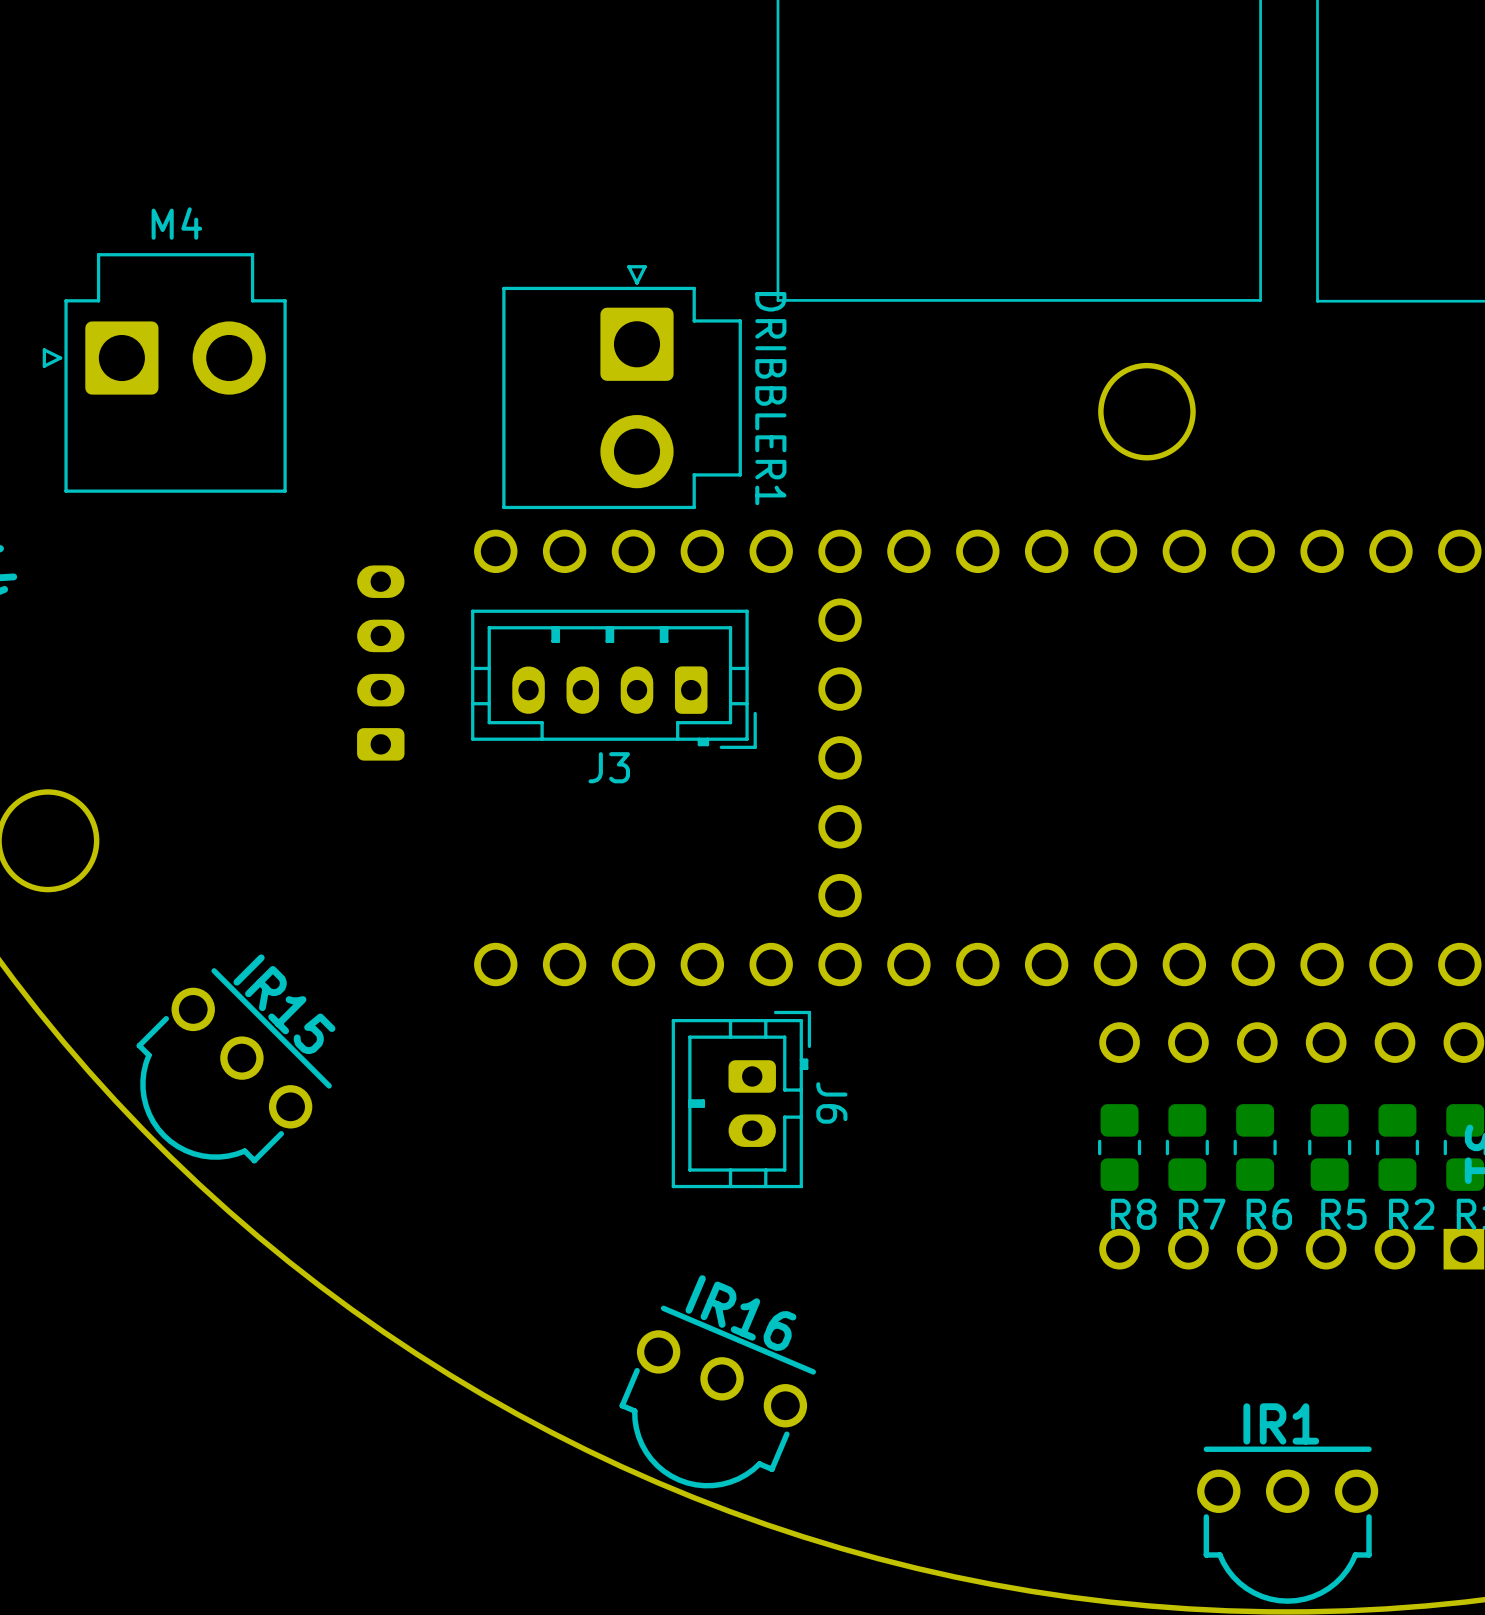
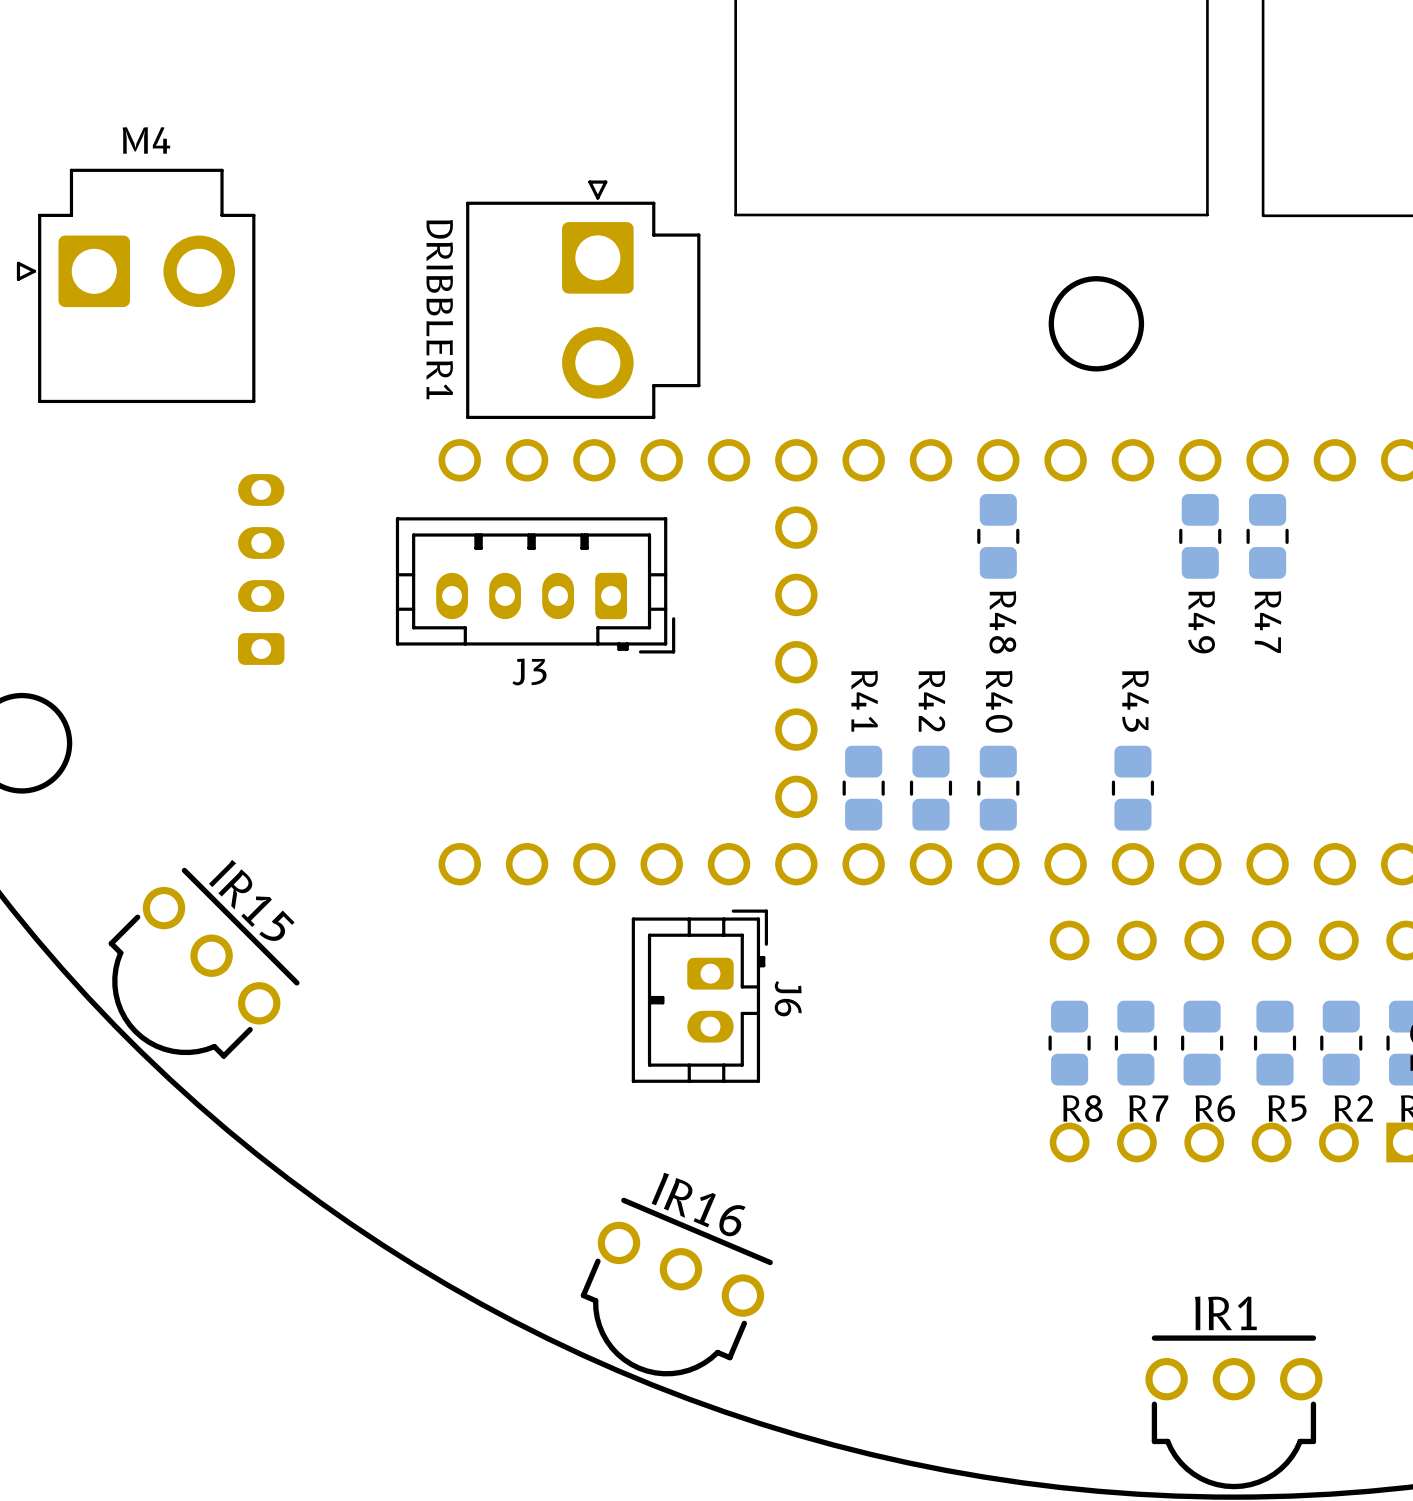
DRIBBLER1 name position: DRIBBLER1 (770, 398) -> DRIBBLER1 (439, 309)
R48: none -> (998, 536)
R49: none -> (1200, 536)
R47: none -> (1267, 536)
part position: (380, 663) -> (261, 569)
J3 position: (613, 679) -> (535, 585)
R41: none -> (863, 788)
R42: none -> (930, 788)
R40: none -> (998, 788)
R43: none -> (1132, 788)

